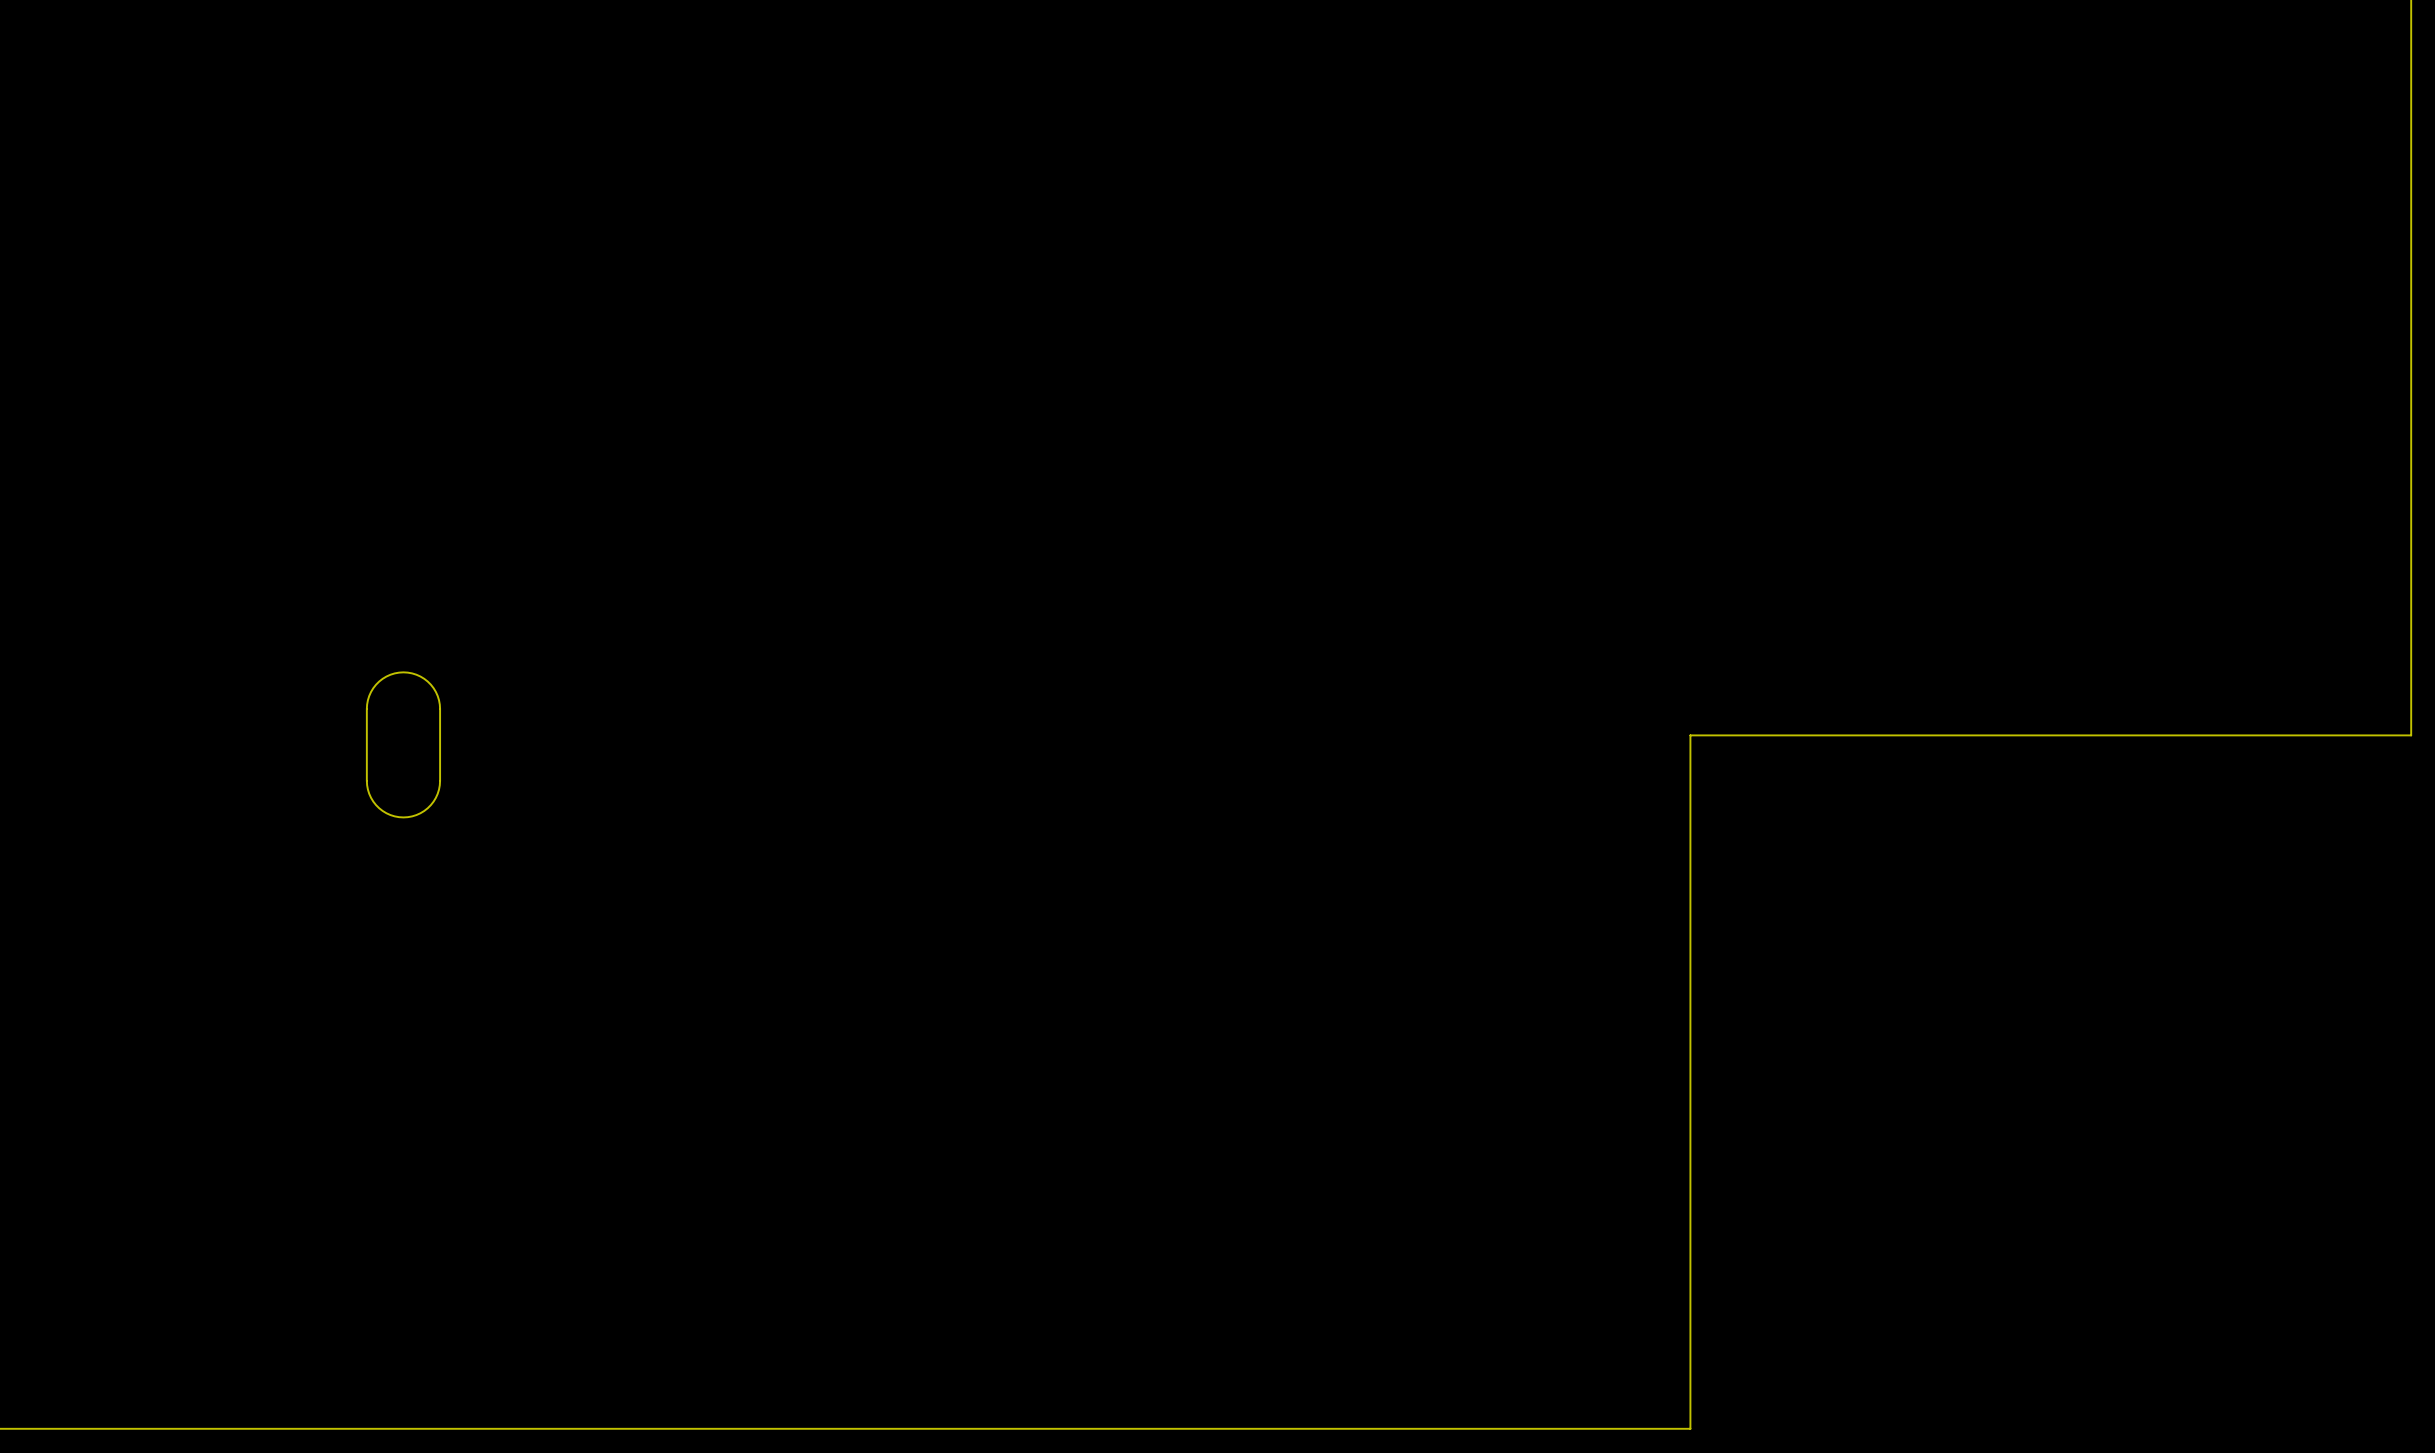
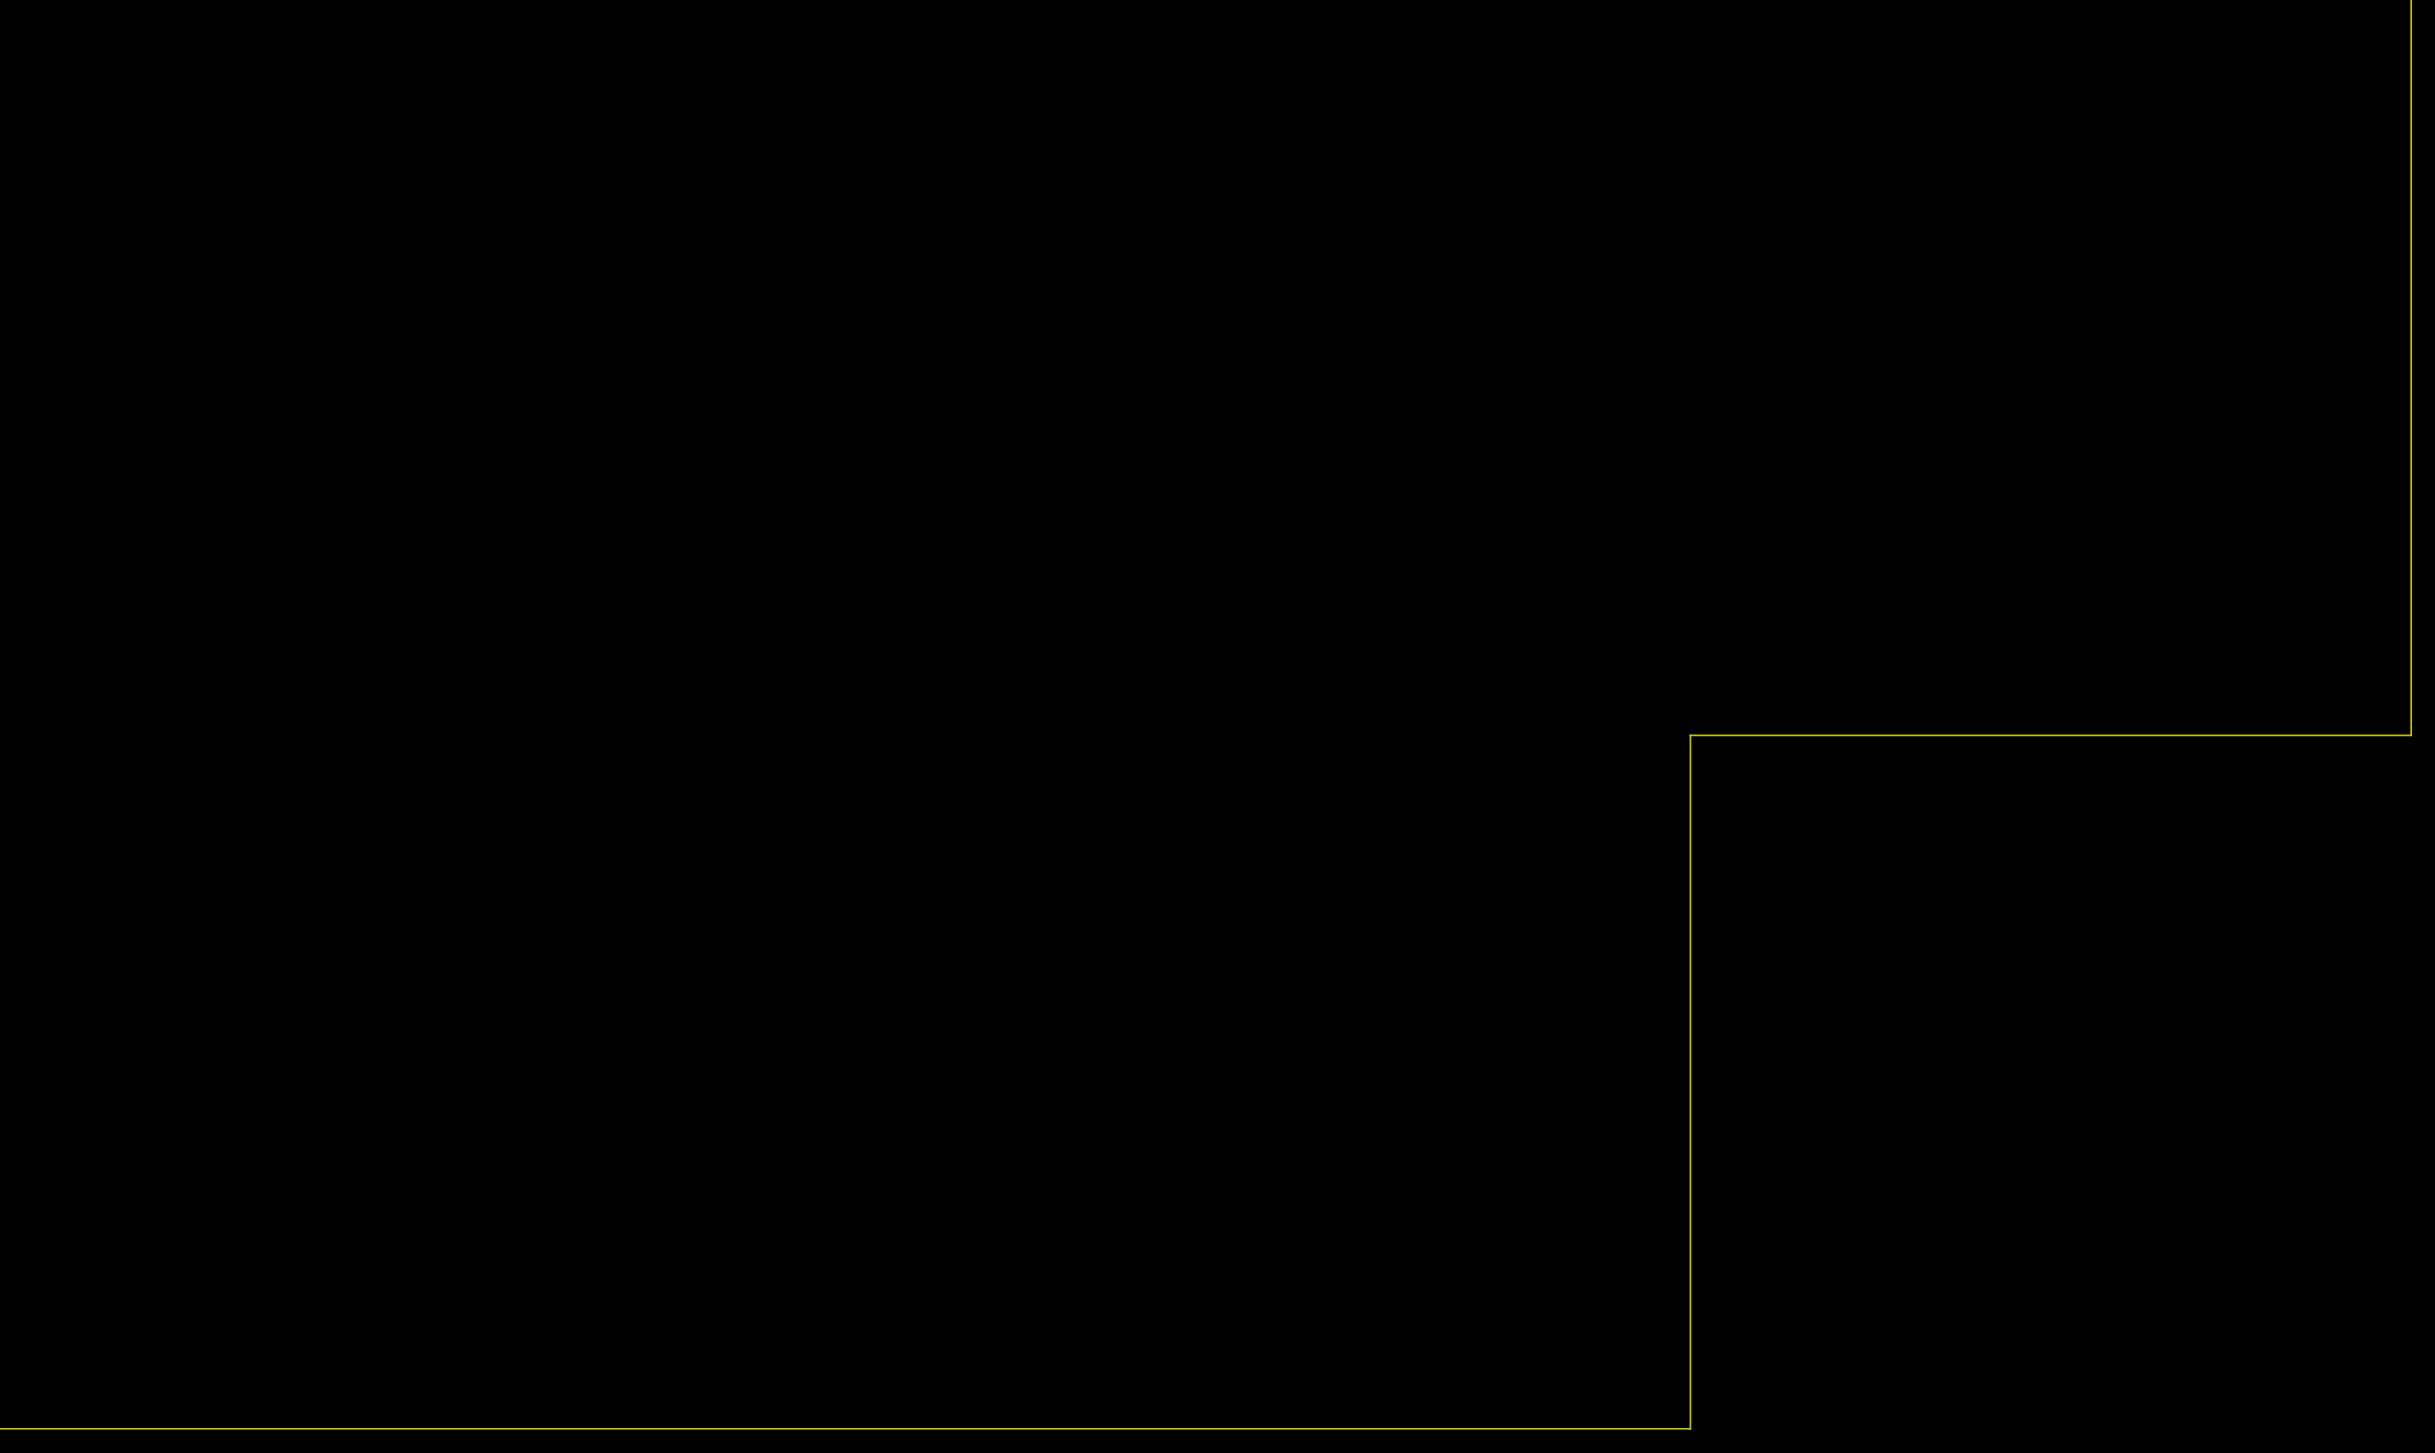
board edge: (366, 708) (366, 780) (371, 797) (379, 808) (390, 815) (407, 817) (420, 813) (433, 801) (439, 785) (440, 708) (435, 691) (427, 681) (416, 674) (403, 672) (394, 673) (382, 678) (373, 688) (369, 695) (366, 708) -> none

